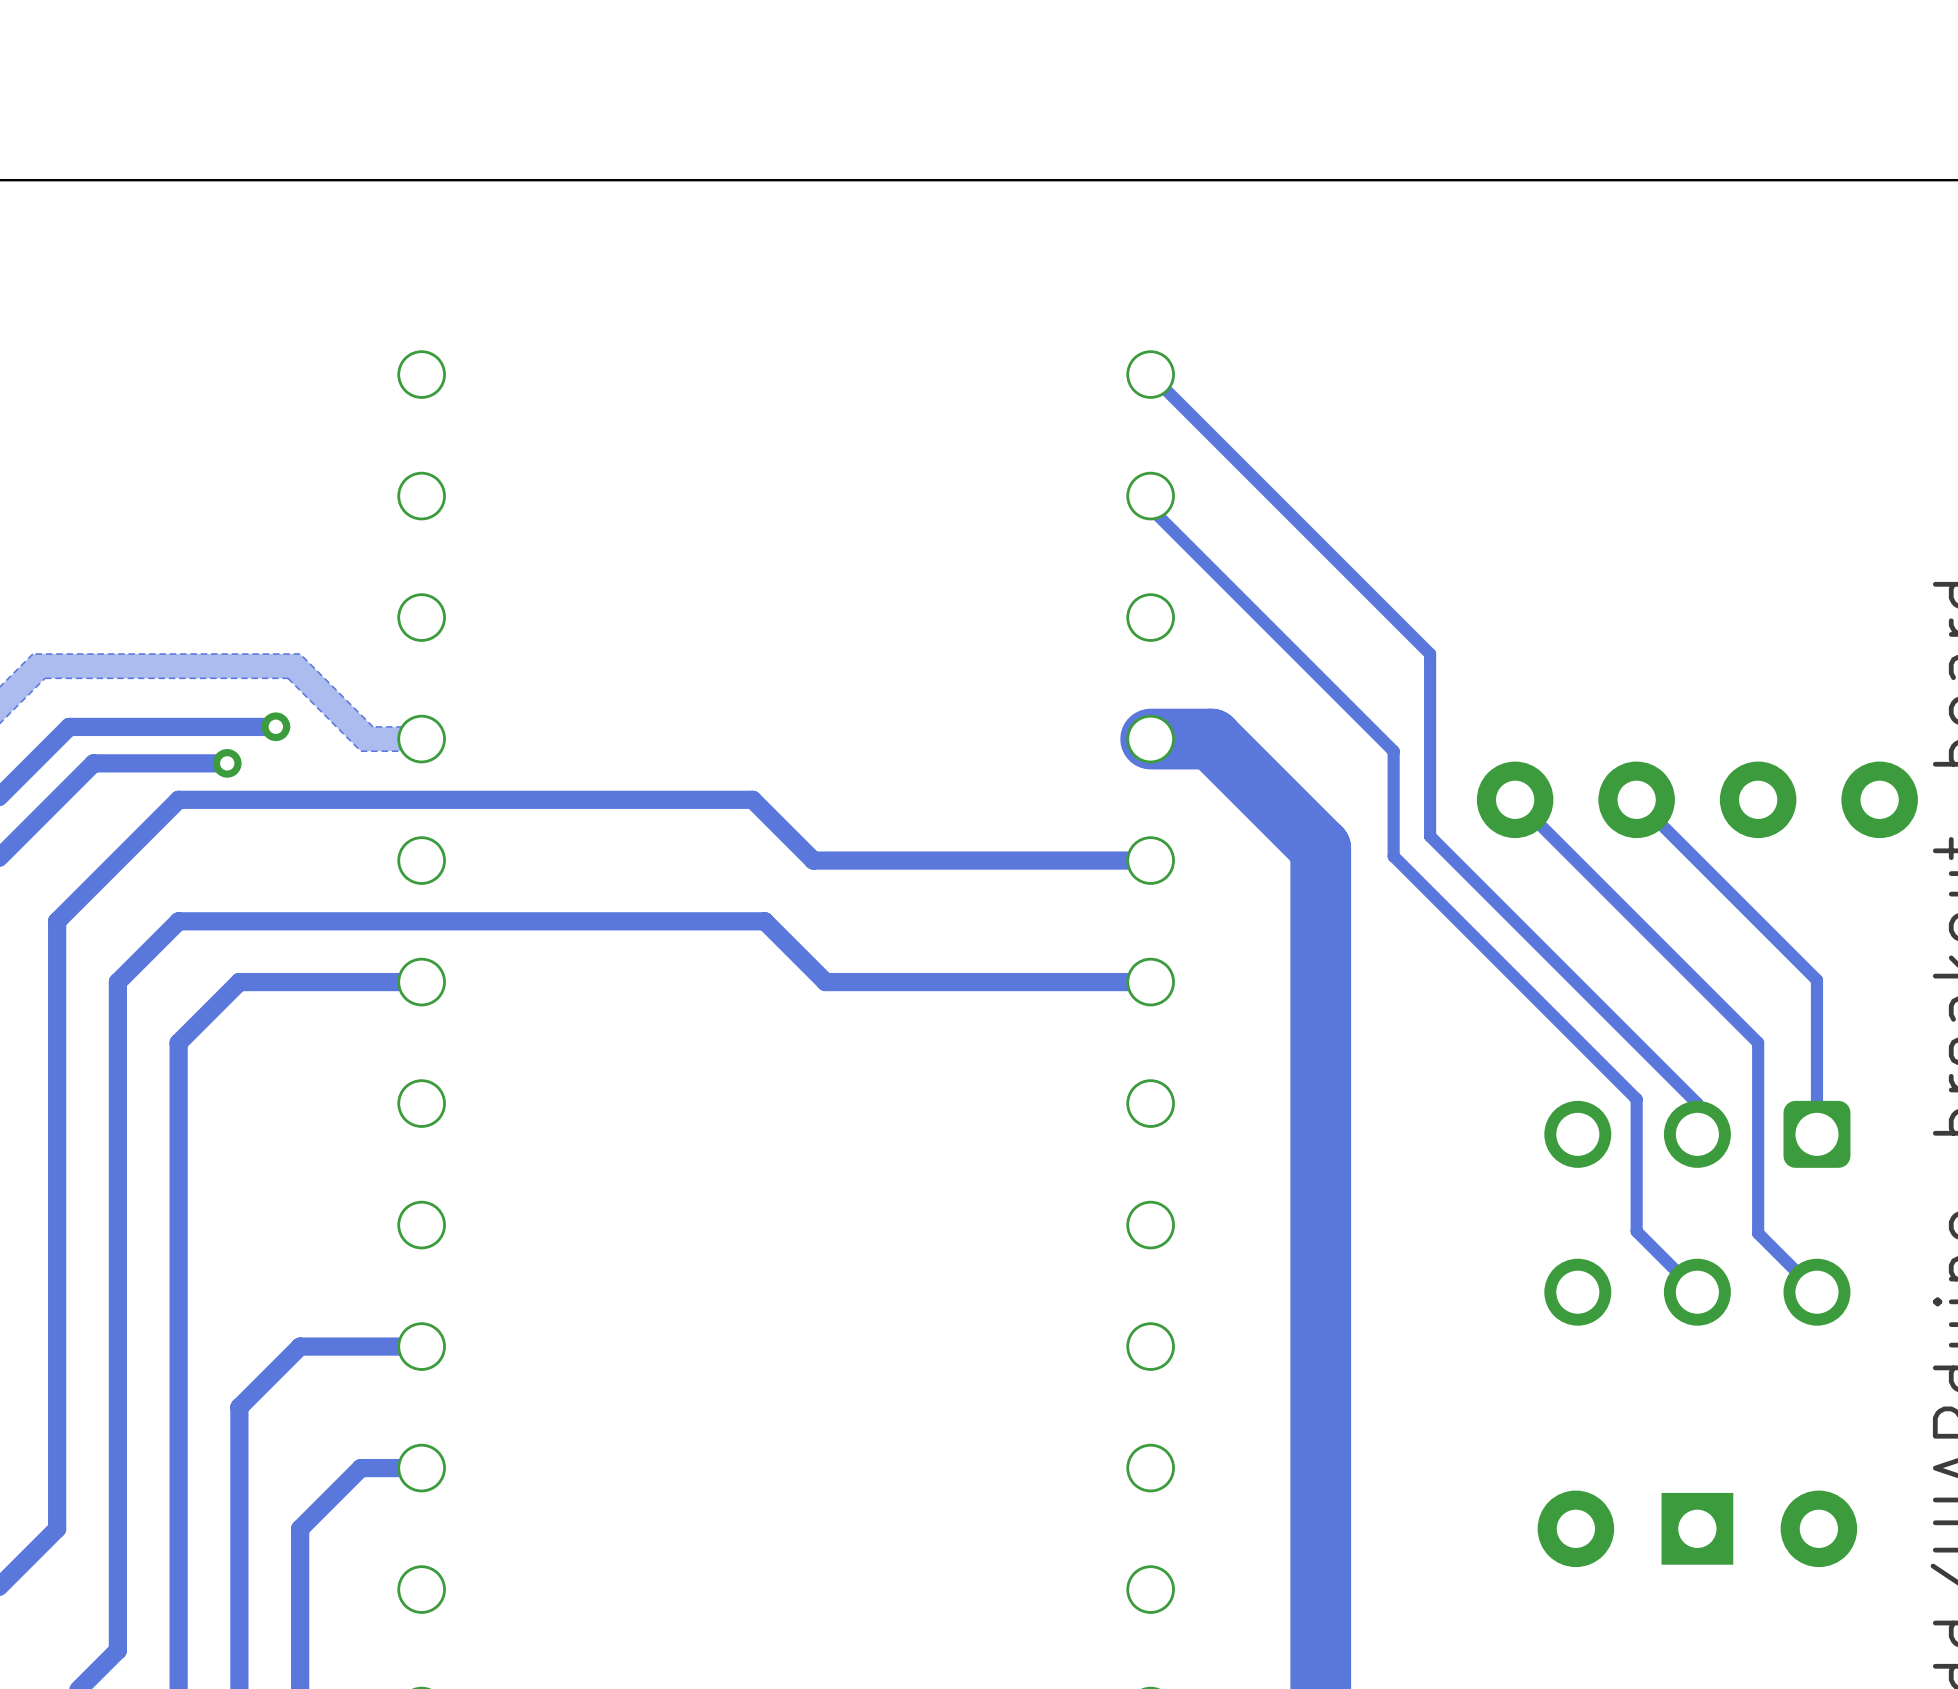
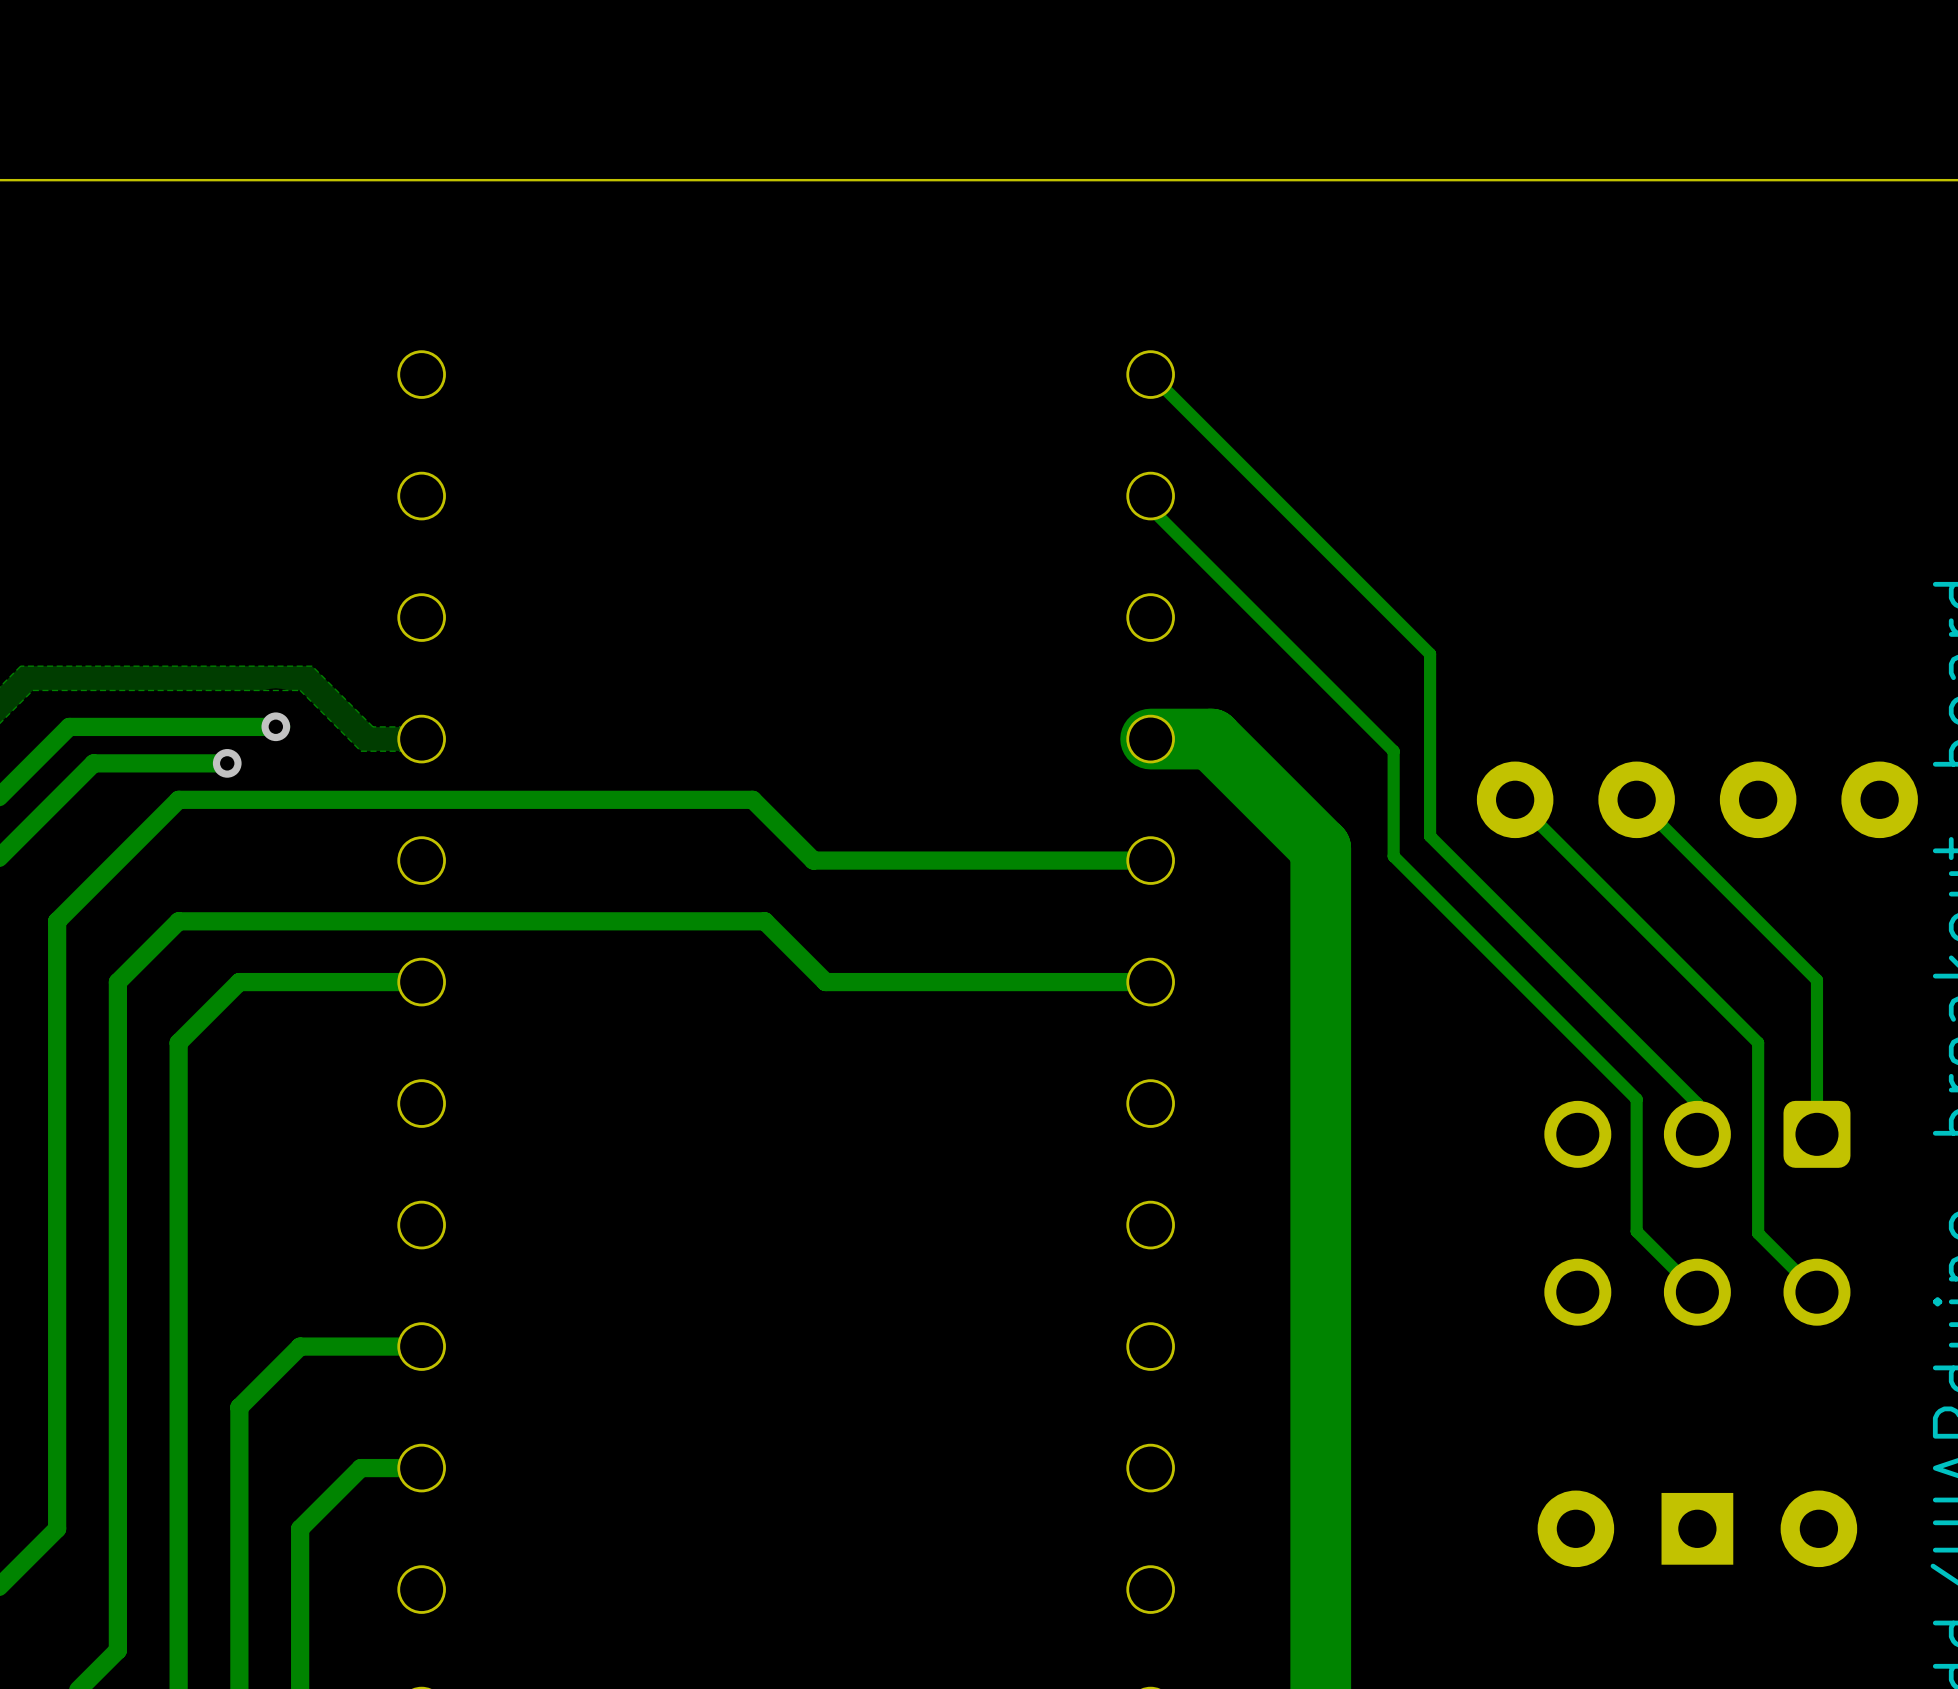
zone outline: (312, 666) (300, 654) (32, 654) (20, 666) -> (312, 666) (20, 666)
zone outline: (300, 690) (287, 678) (44, 678) (32, 690) -> (300, 690) (32, 690)

